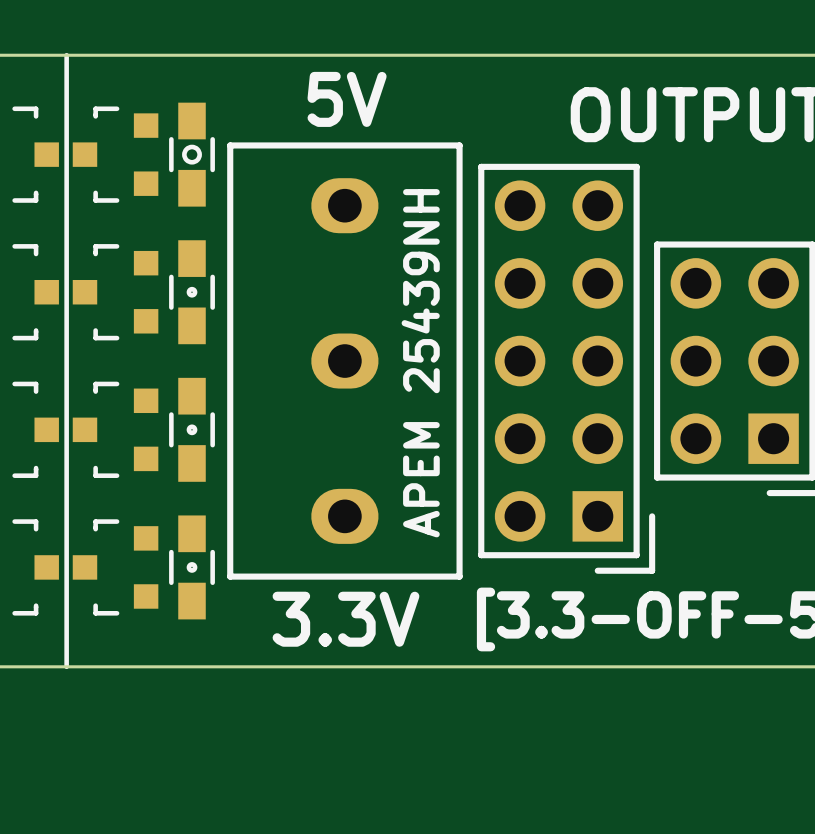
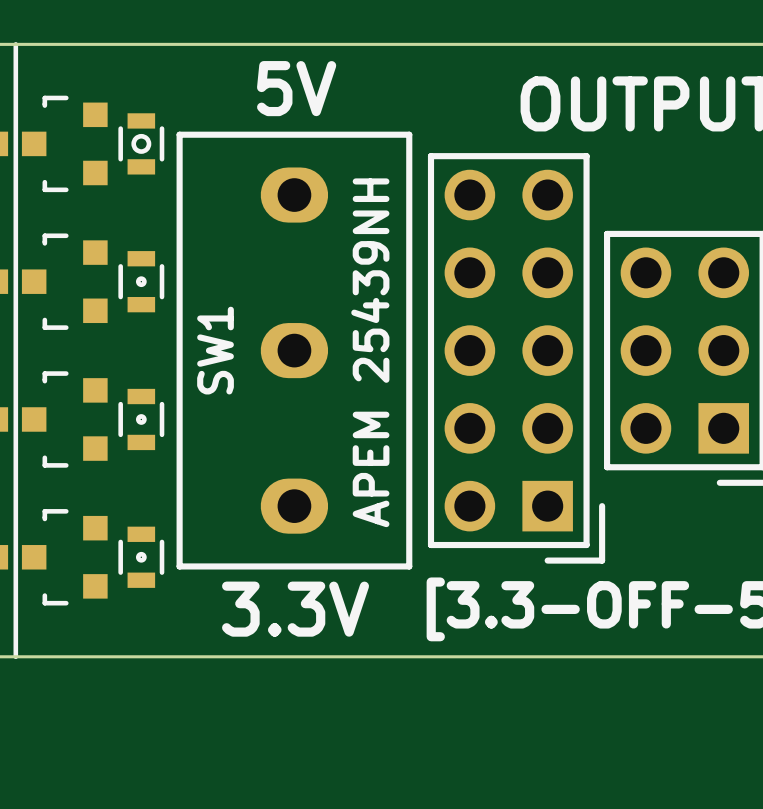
part footprint: [169, 102, 215, 207] -> [118, 113, 165, 175]
part footprint: [169, 240, 215, 345] -> [118, 251, 165, 313]
SW1 name: none -> SW1 (215, 350)
part footprint: [169, 377, 215, 482] -> [118, 388, 165, 451]
part footprint: [169, 515, 215, 620] -> [118, 526, 165, 588]

